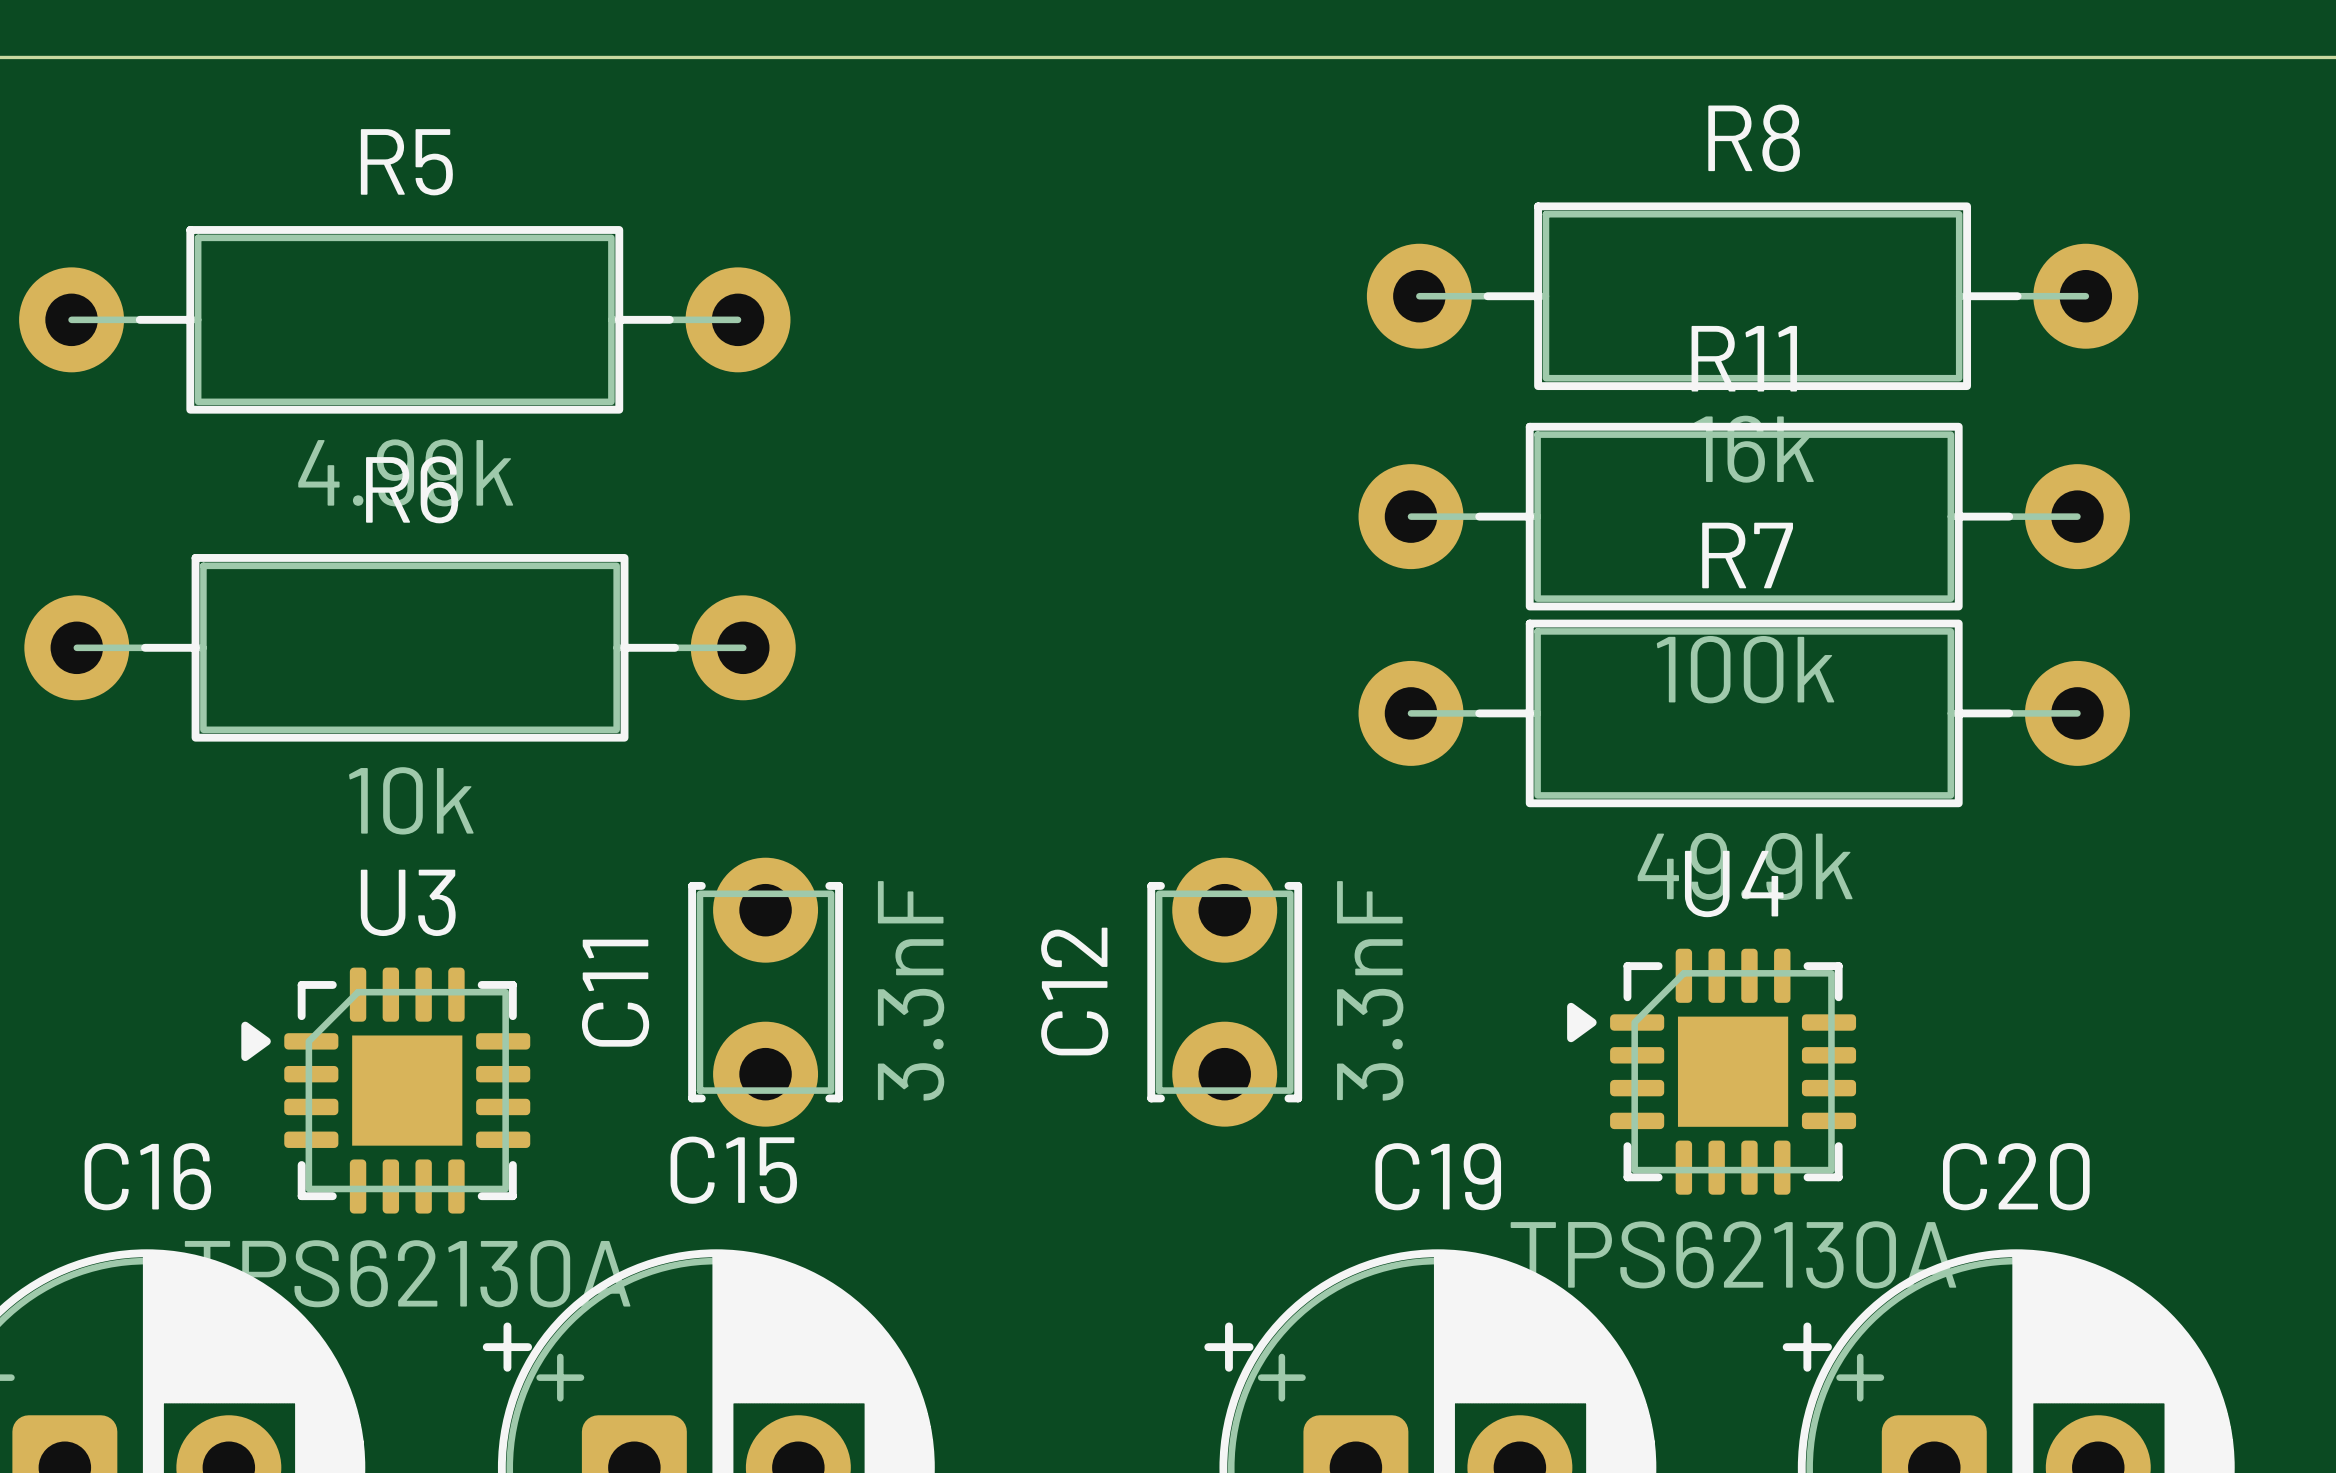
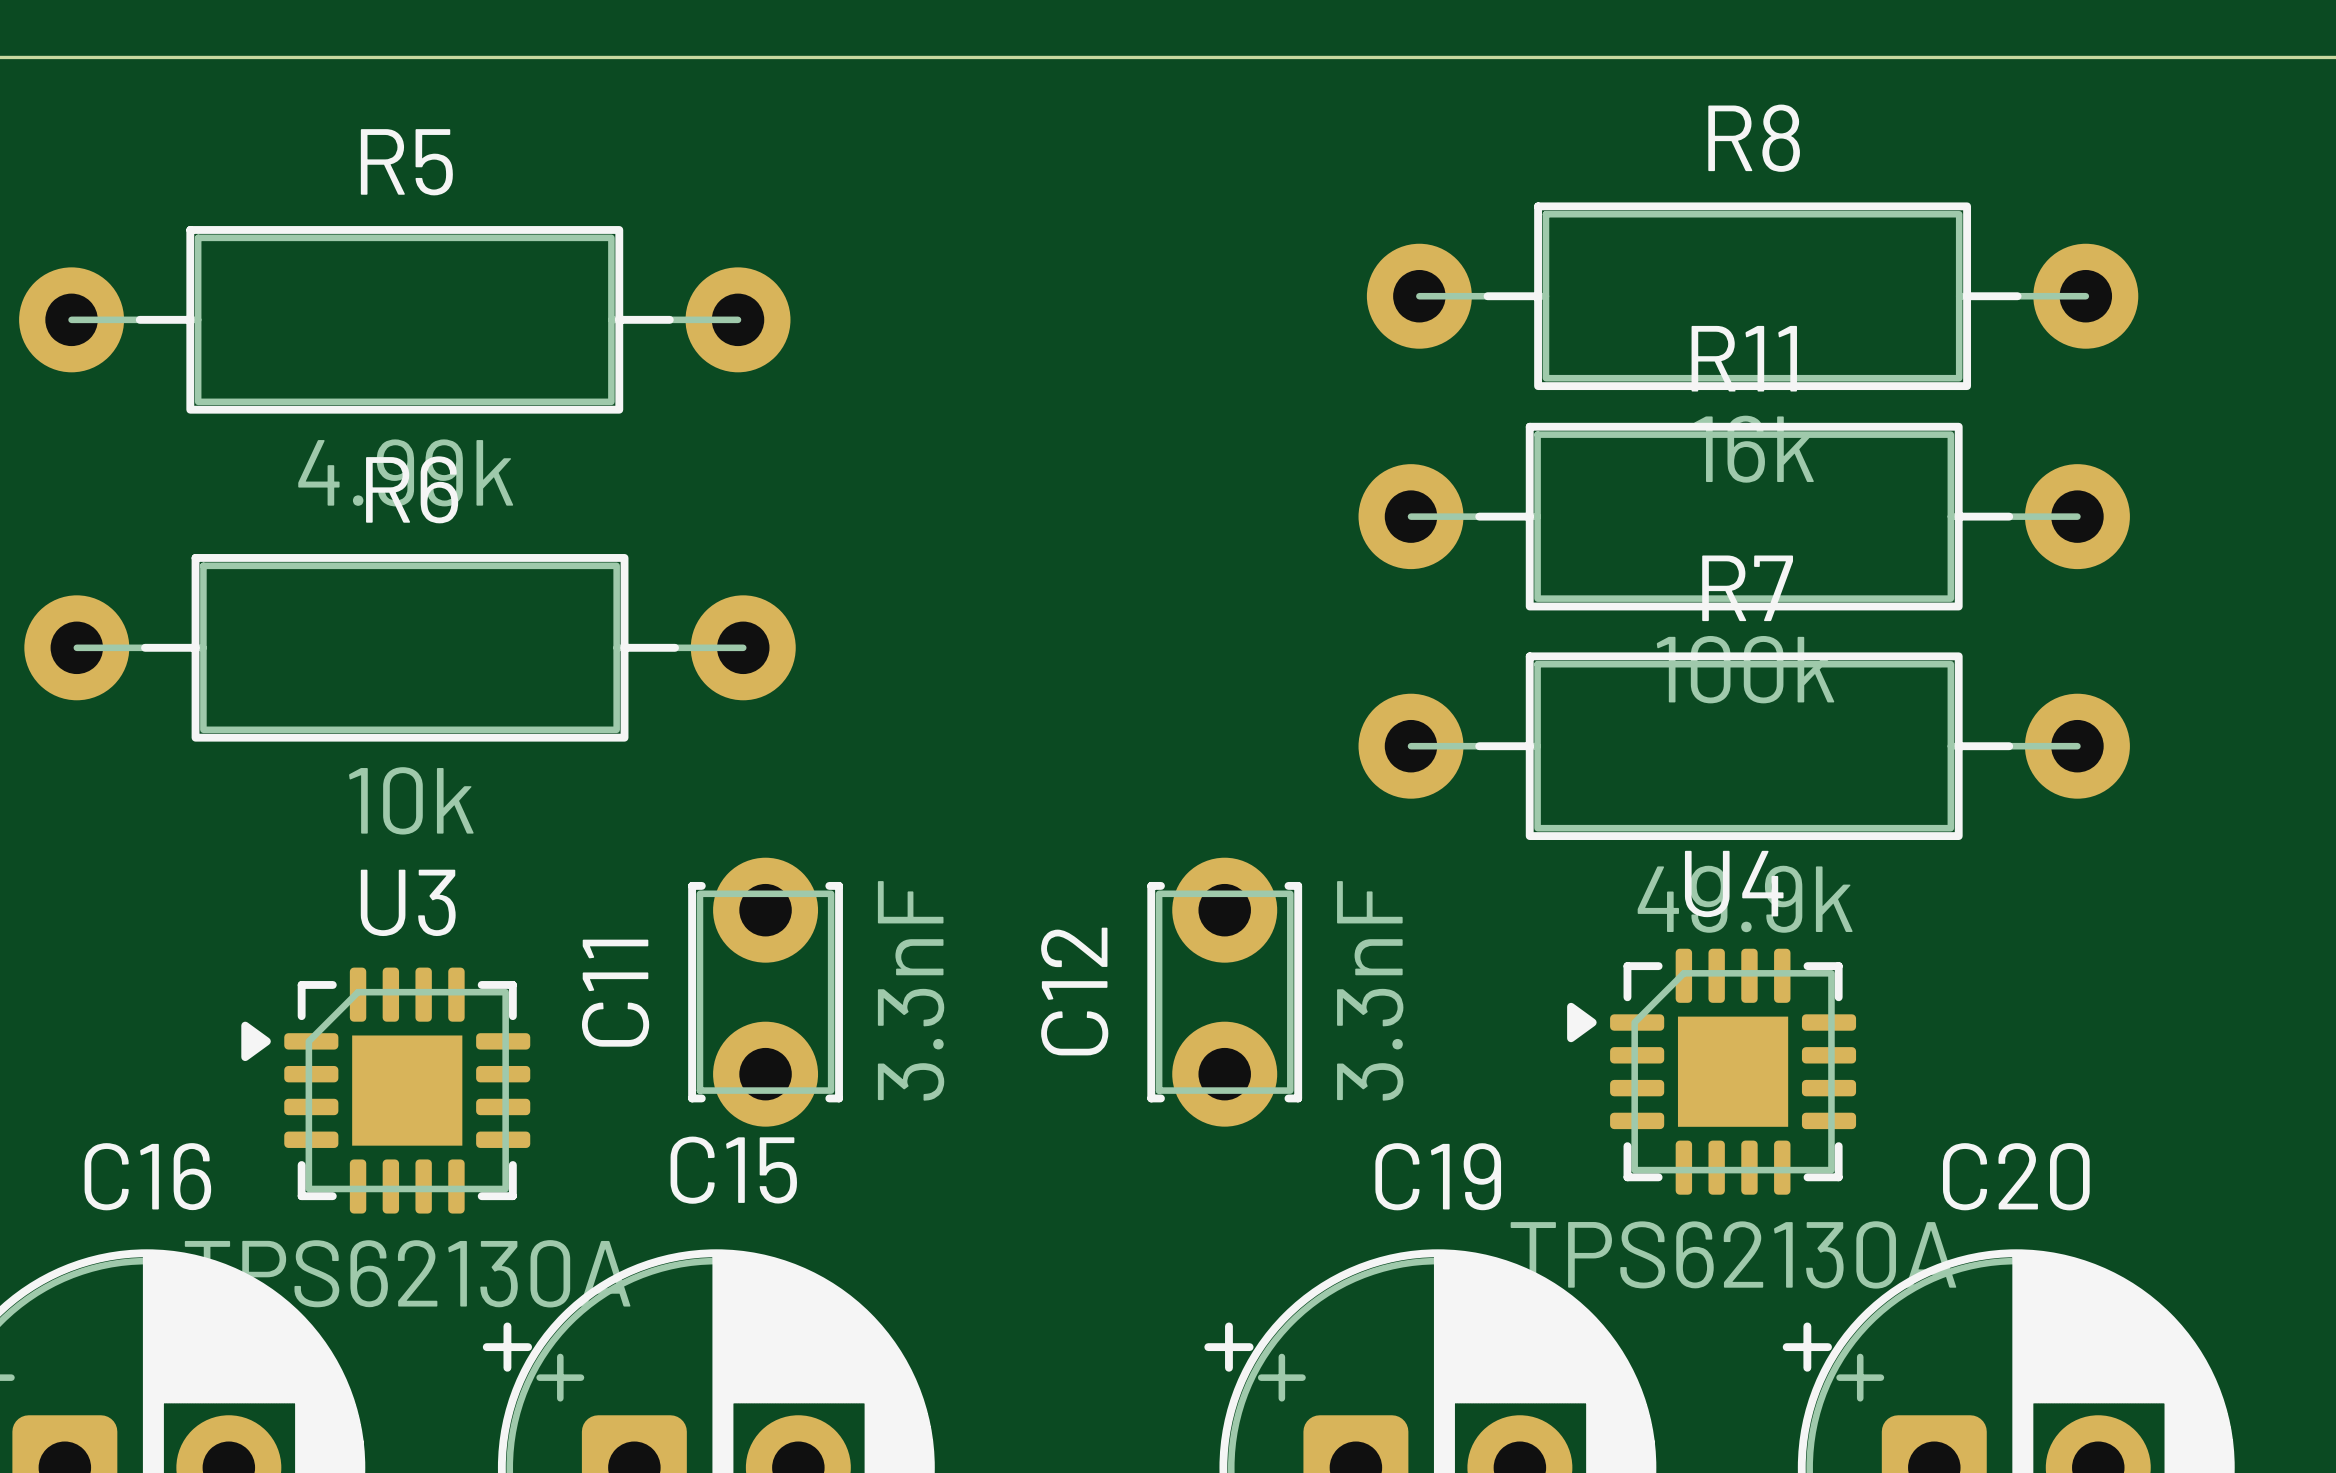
R7 position: (1744, 713) -> (1744, 746)

